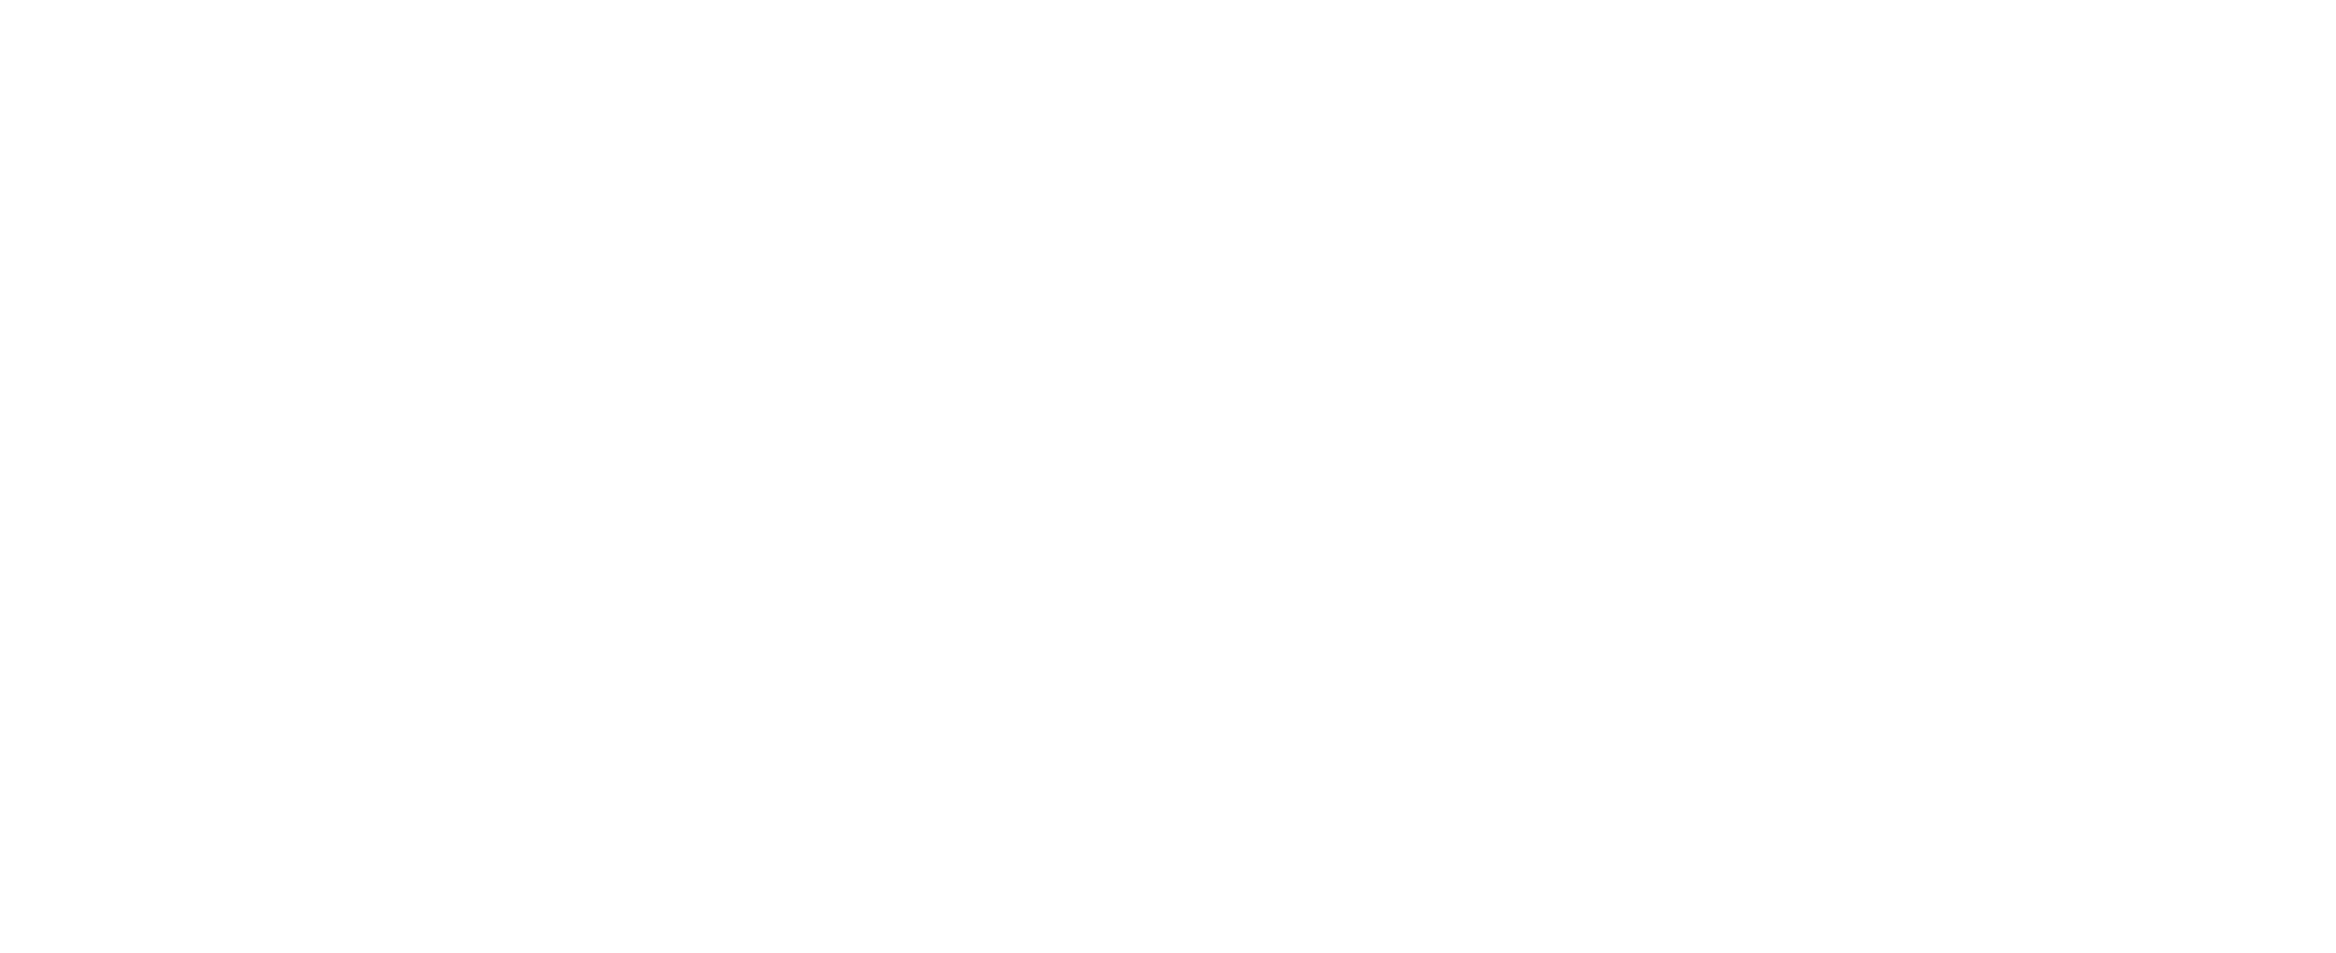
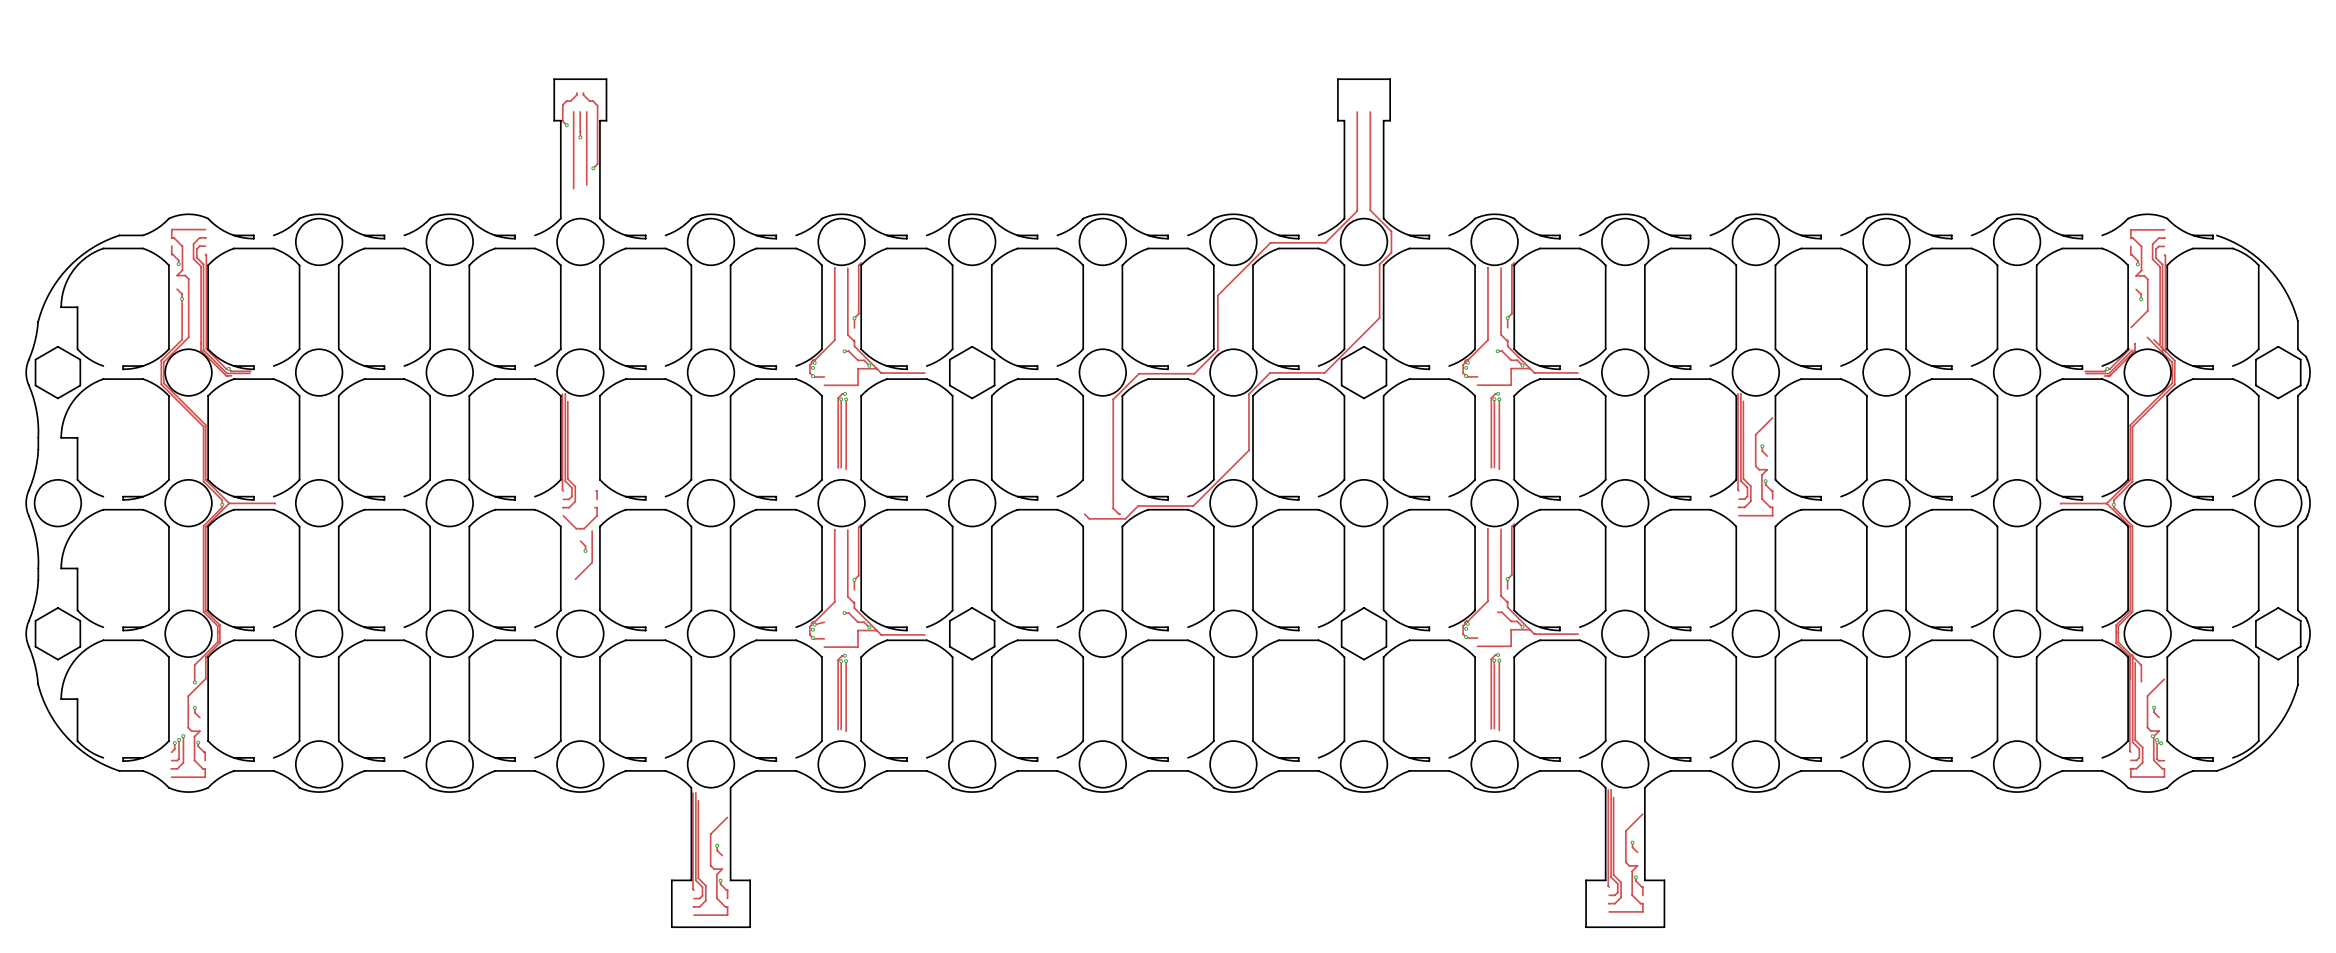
track: none -> (576, 92) (570, 101) (566, 101) (562, 104) (562, 121) (566, 125)
track: none -> (583, 92) (589, 101) (592, 101) (597, 105) (597, 164) (593, 168)
track: none -> (573, 111) (573, 188)
track: none -> (580, 111) (580, 137)
track: none -> (586, 111) (586, 185)
track: none -> (1357, 112) (1357, 211) (1325, 242) (1270, 242) (1217, 295) (1217, 350) (1194, 373) (1139, 373) (1113, 399) (1113, 508) (1120, 514)
track: none -> (1370, 112) (1370, 210) (1391, 231) (1391, 252) (1379, 264) (1379, 317) (1324, 372) (1270, 372) (1248, 394) (1248, 450) (1193, 506) (1138, 506) (1125, 518) (1089, 518) (1084, 514)
via: none -> (566, 125)
via: none -> (580, 137)
via: none -> (593, 168)
round board edge: none -> [295, 217, 344, 266]
round board edge: none -> [425, 217, 474, 266]
round board edge: none -> [556, 217, 605, 266]
round board edge: none -> [687, 217, 735, 266]
round board edge: none -> [817, 217, 866, 266]
round board edge: none -> [948, 217, 997, 266]
round board edge: none -> [1078, 217, 1127, 266]
round board edge: none -> [1209, 217, 1258, 266]
round board edge: none -> [1340, 217, 1389, 266]
round board edge: none -> [1470, 217, 1519, 266]
round board edge: none -> [1601, 217, 1650, 266]
round board edge: none -> [1731, 217, 1780, 266]
round board edge: none -> [1862, 217, 1911, 266]
round board edge: none -> [1993, 217, 2042, 266]
track: none -> (205, 229) (171, 229) (171, 237) (182, 246) (182, 270) (177, 275) (185, 275) (188, 279) (188, 337) (163, 362) (163, 383) (205, 425) (205, 479) (229, 503)
track: none -> (2164, 229) (2130, 229) (2130, 238) (2141, 246) (2141, 270) (2136, 275) (2144, 275) (2147, 279) (2147, 310) (2131, 327)
board edge: none -> (233, 235) (253, 235) (253, 238) (243, 237) (238, 236) (233, 235) (219, 228) (208, 218) (188, 214) (168, 218) (157, 228) (143, 235) (119, 235) (112, 237) (94, 246) (72, 263) (54, 284) (42, 308) (26, 372) (35, 404) (38, 424) (36, 463) (26, 503) (36, 541) (38, 561) (36, 594) (26, 633) (40, 691) (54, 721) (77, 747) (100, 762) (119, 770) (143, 770) (157, 777) (168, 787) (184, 791) (196, 791) (208, 787) (219, 777) (233, 770) (273, 770) (287, 777) (299, 787) (319, 792) (338, 787) (350, 777) (364, 770) (404, 770) (418, 777) (430, 787) (449, 792) (469, 787) (481, 777) (495, 770) (534, 770) (548, 777) (560, 787) (580, 792) (599, 787) (611, 777) (625, 770) (665, 770) (679, 777) (691, 787) (691, 880) (671, 880) (671, 927) (750, 927) (750, 880) (730, 880) (730, 787) (742, 777) (756, 770) (796, 770) (810, 777) (822, 787) (841, 792) (861, 787) (873, 777) (887, 770) (926, 770) (940, 777) (952, 787) (972, 792) (991, 787) (1003, 777) (1017, 770) (1057, 770) (1071, 777) (1083, 787) (1102, 792) (1122, 787) (1134, 777) (1148, 770) (1187, 770) (1201, 777) (1213, 787) (1233, 792) (1253, 787) (1264, 777) (1278, 770) (1318, 770) (1332, 777) (1344, 787) (1364, 792) (1383, 787) (1395, 777) (1409, 770) (1449, 770) (1463, 777) (1475, 787) (1494, 792) (1514, 787) (1526, 777) (1540, 770) (1579, 770) (1593, 777) (1605, 787) (1605, 880) (1586, 880) (1586, 927) (1664, 927) (1664, 880) (1644, 880) (1644, 787) (1656, 777) (1670, 770) (1710, 770) (1724, 777) (1736, 787) (1755, 792) (1775, 787) (1787, 777) (1801, 770) (1841, 770) (1855, 777) (1866, 787) (1886, 792) (1906, 787) (1917, 777) (1931, 770) (1971, 770) (1985, 777) (1997, 787) (2017, 792) (2036, 787) (2048, 777) (2062, 770) (2102, 770) (2116, 777) (2128, 787) (2147, 792) (2167, 787) (2179, 777) (2193, 770) (2216, 770) (2229, 765) (2258, 747) (2281, 722) (2291, 704) (2297, 685) (2297, 657) (2306, 649) (2309, 640) (2307, 621) (2297, 610) (2297, 526) (2306, 519) (2310, 503) (2306, 487) (2297, 479) (2297, 395) (2306, 388) (2310, 372) (2306, 356) (2297, 349) (2297, 321) (2295, 314) (2281, 284) (2268, 267) (2253, 254) (2235, 243) (2216, 235)
board edge: none -> (273, 235) (287, 228) (299, 218) (319, 214) (338, 218) (350, 228) (364, 235) (369, 236) (374, 237) (384, 238) (384, 235) (364, 235)
board edge: none -> (404, 235) (418, 228) (430, 218) (449, 214) (469, 218) (481, 228) (494, 235) (499, 236) (504, 237) (515, 238) (515, 235) (495, 235)
board edge: none -> (534, 235) (548, 228) (560, 218) (560, 120) (554, 120) (554, 79) (606, 79) (606, 120) (599, 120) (599, 218) (620, 233) (625, 235) (630, 236) (645, 238) (645, 235) (625, 235)
board edge: none -> (665, 235) (679, 228) (691, 218) (710, 214) (730, 218) (742, 228) (756, 235) (761, 236) (766, 237) (776, 238) (776, 235) (756, 235)
board edge: none -> (796, 235) (810, 228) (822, 218) (841, 214) (861, 218) (872, 228) (886, 235) (891, 236) (896, 237) (906, 238) (906, 235) (887, 235)
board edge: none -> (926, 235) (940, 228) (952, 218) (972, 214) (991, 218) (1003, 228) (1017, 235) (1022, 236) (1027, 237) (1037, 238) (1037, 235) (1017, 235)
board edge: none -> (1057, 235) (1071, 228) (1083, 218) (1102, 214) (1122, 218) (1134, 228) (1147, 235) (1152, 236) (1157, 237) (1168, 238) (1168, 235) (1148, 235)
board edge: none -> (1187, 235) (1201, 228) (1213, 218) (1233, 214) (1253, 218) (1264, 228) (1278, 235) (1283, 236) (1288, 237) (1298, 238) (1298, 235) (1278, 235)
board edge: none -> (1318, 235) (1332, 228) (1344, 218) (1344, 120) (1337, 120) (1337, 79) (1390, 79) (1390, 120) (1383, 120) (1383, 218) (1404, 233) (1409, 235) (1414, 236) (1429, 238) (1429, 235) (1409, 235)
board edge: none -> (1449, 235) (1463, 228) (1475, 218) (1494, 214) (1514, 218) (1525, 228) (1539, 235) (1544, 236) (1549, 237) (1559, 238) (1559, 235) (1540, 235)
board edge: none -> (1579, 235) (1593, 228) (1605, 218) (1625, 214) (1644, 218) (1656, 228) (1670, 235) (1675, 236) (1680, 237) (1690, 238) (1690, 235) (1670, 235)
board edge: none -> (1710, 235) (1724, 228) (1736, 218) (1755, 214) (1775, 218) (1787, 228) (1800, 235) (1805, 236) (1810, 237) (1821, 238) (1821, 235) (1801, 235)
board edge: none -> (1841, 235) (1855, 228) (1866, 218) (1886, 214) (1906, 218) (1917, 228) (1931, 235) (1936, 236) (1941, 237) (1951, 238) (1951, 235) (1931, 235)
board edge: none -> (1971, 235) (1985, 228) (1997, 218) (2017, 214) (2036, 218) (2048, 228) (2062, 235) (2067, 236) (2072, 237) (2082, 238) (2082, 235) (2062, 235)
board edge: none -> (2102, 235) (2116, 228) (2128, 218) (2147, 214) (2167, 218) (2179, 228) (2192, 235) (2197, 236) (2202, 237) (2213, 238) (2213, 235) (2193, 235)
track: none -> (206, 237) (199, 237) (193, 244) (193, 259) (201, 266) (201, 350) (226, 375) (231, 375)
track: none -> (2165, 238) (2158, 238) (2152, 244) (2152, 259) (2160, 266) (2160, 344)
track: none -> (171, 246) (171, 254) (178, 260) (178, 264)
track: none -> (205, 246) (199, 246) (196, 248) (196, 257) (203, 264) (203, 350) (226, 373) (250, 373)
track: none -> (2130, 246) (2130, 254) (2137, 260) (2137, 264)
track: none -> (2164, 246) (2158, 246) (2155, 249) (2155, 257) (2162, 264) (2162, 352)
track: none -> (205, 254) (206, 349) (226, 368) (231, 371) (250, 371)
track: none -> (2164, 254) (2165, 351)
track: none -> (861, 262) (858, 265) (858, 313) (854, 318) (854, 327)
track: none -> (1514, 262) (1511, 265) (1511, 313) (1507, 318) (1507, 327)
via: none -> (178, 264)
via: none -> (2137, 264)
track: none -> (1487, 267) (1487, 340) (1463, 364) (1463, 373) (1467, 376) (1477, 376)
track: none -> (834, 268) (834, 340) (809, 365) (809, 373) (813, 377) (824, 377)
track: none -> (847, 268) (847, 334) (854, 341)
track: none -> (1501, 268) (1501, 334) (1507, 341)
track: none -> (177, 289) (182, 294) (182, 339) (161, 360) (161, 384) (203, 426) (203, 481) (222, 500) (222, 507) (203, 526) (203, 611) (217, 625) (217, 642) (194, 665) (194, 681)
track: none -> (2136, 289) (2141, 294) (2141, 299)
via: none -> (182, 298)
via: none -> (2141, 299)
via: none -> (854, 318)
via: none -> (1507, 318)
track: none -> (2147, 337) (2172, 362) (2172, 383) (2130, 425) (2130, 480) (2106, 503)
track: none -> (2153, 339) (2174, 360) (2174, 384) (2132, 426) (2132, 481) (2113, 500) (2113, 507) (2132, 526) (2132, 611) (2118, 626) (2118, 642) (2141, 665) (2141, 681)
track: none -> (854, 340) (854, 346) (881, 373) (924, 373)
track: none -> (1507, 340) (1507, 346) (1534, 372) (1578, 372)
track: none -> (2135, 343) (2134, 350)
board edge: none -> (57, 346) (35, 359) (35, 385) (57, 398) (80, 385) (80, 359) (57, 346)
board edge: none -> (972, 346) (994, 359) (994, 385) (972, 398) (949, 385) (949, 359) (972, 346)
board edge: none -> (1364, 346) (1386, 359) (1386, 385) (1364, 398) (1341, 385) (1341, 359) (1364, 346)
board edge: none -> (2278, 346) (2300, 359) (2300, 385) (2278, 398) (2255, 385) (2255, 359) (2278, 346)
round board edge: none -> [164, 348, 213, 397]
round board edge: none -> [295, 348, 344, 397]
round board edge: none -> [425, 348, 474, 397]
round board edge: none -> [556, 348, 605, 397]
round board edge: none -> [687, 348, 735, 397]
round board edge: none -> [1078, 348, 1127, 397]
round board edge: none -> [1209, 348, 1258, 397]
round board edge: none -> [1601, 348, 1650, 397]
round board edge: none -> [1731, 348, 1780, 397]
round board edge: none -> [1862, 348, 1911, 397]
round board edge: none -> [1993, 348, 2042, 397]
round board edge: none -> [2123, 348, 2172, 397]
track: none -> (2129, 349) (2109, 369) (2104, 371) (2085, 371)
track: none -> (2132, 350) (2109, 373) (2085, 373)
track: none -> (844, 351) (848, 351) (858, 360) (864, 360) (869, 365)
via: none -> (844, 351)
track: none -> (1497, 351) (1502, 351) (1511, 360) (1517, 360) (1522, 365)
via: none -> (1497, 351)
track: none -> (2134, 351) (2109, 375) (2104, 375)
via: none -> (814, 362)
via: none -> (1467, 362)
via: none -> (869, 365)
via: none -> (1522, 365)
board edge: none -> (103, 366) (89, 359) (77, 349) (77, 307) (61, 307) (64, 288) (72, 271) (86, 257) (103, 248) (143, 248) (157, 255) (168, 265) (168, 349) (148, 364) (143, 365) (138, 367) (133, 368) (123, 369) (123, 366) (143, 366)
board edge: none -> (233, 366) (253, 366) (253, 369) (238, 367) (233, 365) (228, 364) (208, 349) (208, 265) (219, 255) (233, 248) (273, 248) (287, 255) (299, 265) (299, 349) (287, 359) (273, 366)
board edge: none -> (364, 366) (384, 366) (384, 369) (369, 367) (364, 365) (359, 364) (338, 349) (338, 265) (350, 255) (364, 248) (404, 248) (418, 255) (430, 265) (430, 349) (418, 359) (404, 366)
board edge: none -> (495, 366) (515, 366) (515, 369) (504, 368) (499, 367) (494, 365) (490, 364) (469, 349) (469, 265) (481, 255) (495, 248) (534, 248) (548, 255) (560, 265) (560, 349) (548, 359) (534, 366)
board edge: none -> (625, 366) (645, 366) (645, 369) (635, 368) (630, 367) (625, 365) (620, 364) (599, 349) (599, 265) (611, 255) (625, 248) (665, 248) (679, 255) (691, 265) (691, 349) (679, 359) (665, 366)
board edge: none -> (756, 366) (776, 366) (776, 369) (761, 367) (756, 365) (751, 364) (730, 349) (730, 265) (742, 255) (756, 248) (796, 248) (810, 255) (822, 265) (822, 349) (810, 359) (796, 366)
board edge: none -> (887, 366) (906, 366) (906, 369) (891, 367) (886, 365) (881, 364) (861, 349) (861, 265) (873, 255) (887, 248) (926, 248) (940, 255) (952, 265) (952, 349) (940, 359) (926, 366)
board edge: none -> (1017, 366) (1037, 366) (1037, 369) (1022, 367) (1017, 365) (1012, 364) (991, 349) (991, 265) (1003, 255) (1017, 248) (1057, 248) (1071, 255) (1083, 265) (1083, 349) (1071, 359) (1057, 366)
board edge: none -> (1148, 366) (1168, 366) (1168, 369) (1152, 367) (1147, 365) (1143, 364) (1122, 349) (1122, 265) (1134, 255) (1148, 248) (1187, 248) (1201, 255) (1213, 265) (1213, 349) (1201, 359) (1187, 366)
board edge: none -> (1278, 366) (1298, 366) (1298, 369) (1283, 367) (1278, 365) (1273, 364) (1253, 349) (1253, 265) (1264, 255) (1278, 248) (1318, 248) (1332, 255) (1344, 265) (1344, 349) (1332, 359) (1318, 366)
board edge: none -> (1409, 366) (1429, 366) (1429, 369) (1419, 368) (1414, 367) (1409, 365) (1404, 364) (1383, 349) (1383, 265) (1395, 255) (1409, 248) (1449, 248) (1463, 255) (1475, 265) (1475, 349) (1463, 359) (1449, 366)
board edge: none -> (1540, 366) (1559, 366) (1559, 369) (1544, 367) (1539, 365) (1534, 364) (1514, 349) (1514, 265) (1526, 255) (1540, 248) (1579, 248) (1593, 255) (1605, 265) (1605, 349) (1593, 359) (1579, 366)
board edge: none -> (1670, 366) (1690, 366) (1690, 369) (1680, 368) (1675, 367) (1670, 365) (1665, 364) (1644, 349) (1644, 265) (1656, 255) (1670, 248) (1710, 248) (1724, 255) (1736, 265) (1736, 349) (1724, 359) (1710, 366)
board edge: none -> (1801, 366) (1821, 366) (1821, 369) (1805, 367) (1800, 365) (1796, 364) (1775, 349) (1775, 265) (1787, 255) (1801, 248) (1841, 248) (1855, 255) (1866, 265) (1866, 349) (1855, 359) (1841, 366)
board edge: none -> (1931, 366) (1951, 366) (1951, 369) (1941, 368) (1936, 367) (1931, 365) (1926, 364) (1906, 349) (1906, 265) (1917, 255) (1931, 248) (1971, 248) (1985, 255) (1997, 265) (1997, 349) (1985, 359) (1971, 366)
board edge: none -> (2062, 366) (2082, 366) (2082, 369) (2067, 367) (2062, 365) (2057, 364) (2036, 349) (2036, 265) (2048, 255) (2062, 248) (2102, 248) (2116, 255) (2128, 265) (2128, 349) (2116, 359) (2102, 366)
board edge: none -> (2193, 366) (2213, 366) (2213, 369) (2202, 368) (2197, 367) (2192, 365) (2188, 364) (2167, 349) (2167, 265) (2179, 255) (2193, 248) (2232, 248) (2246, 255) (2258, 265) (2258, 349) (2246, 359) (2232, 366)
via: none -> (813, 367)
via: none -> (1466, 367)
via: none -> (228, 368)
track: none -> (876, 368) (858, 368) (858, 385) (824, 385)
track: none -> (1530, 368) (1511, 368) (1511, 385) (1477, 385)
via: none -> (2107, 369)
via: none -> (813, 376)
via: none -> (1466, 376)
track: none -> (565, 393) (565, 481) (571, 487) (571, 496) (569, 499) (563, 499)
track: none -> (845, 393) (838, 398) (838, 467)
via: none -> (845, 393)
track: none -> (1498, 393) (1491, 398) (1491, 467)
via: none -> (1498, 393)
track: none -> (1738, 393) (1738, 490)
track: none -> (1740, 393) (1740, 480) (1747, 487) (1747, 496) (1744, 499) (1738, 499)
track: none -> (562, 394) (563, 491)
track: none -> (841, 399) (841, 467)
via: none -> (841, 399)
track: none -> (846, 399) (846, 469)
via: none -> (846, 399)
track: none -> (1494, 399) (1494, 467)
via: none -> (1494, 399)
track: none -> (1499, 399) (1499, 469)
via: none -> (1499, 399)
track: none -> (567, 401) (567, 479) (575, 486) (575, 501) (569, 507) (562, 507)
track: none -> (1743, 401) (1743, 478) (1750, 486) (1750, 501) (1744, 507) (1738, 507)
track: none -> (1772, 418) (1755, 434) (1755, 466) (1759, 469) (1767, 469) (1761, 475) (1761, 498) (1772, 507) (1772, 515) (1738, 515)
track: none -> (1762, 446) (1762, 451) (1767, 456)
via: none -> (1762, 446)
round board edge: none -> [33, 479, 82, 528]
round board edge: none -> [164, 479, 213, 528]
round board edge: none -> [295, 479, 344, 528]
round board edge: none -> [425, 479, 474, 528]
round board edge: none -> [687, 479, 735, 528]
round board edge: none -> [817, 479, 866, 528]
round board edge: none -> [948, 479, 997, 528]
round board edge: none -> [1209, 479, 1258, 528]
round board edge: none -> [1340, 479, 1389, 528]
round board edge: none -> [1470, 479, 1519, 528]
round board edge: none -> [1601, 479, 1650, 528]
round board edge: none -> [1862, 479, 1911, 528]
round board edge: none -> [1993, 479, 2042, 528]
round board edge: none -> [2123, 479, 2172, 528]
round board edge: none -> [2254, 479, 2303, 528]
track: none -> (1765, 481) (1765, 484) (1772, 490) (1772, 499)
via: none -> (1765, 481)
track: none -> (596, 491) (597, 499)
board edge: none -> (103, 496) (89, 489) (77, 479) (77, 437) (61, 437) (64, 418) (72, 401) (86, 388) (103, 379) (143, 379) (157, 385) (168, 395) (168, 479) (148, 494) (143, 496) (138, 498) (133, 499) (123, 499) (123, 496) (143, 496)
board edge: none -> (233, 496) (253, 496) (253, 499) (243, 499) (238, 498) (233, 496) (228, 494) (208, 479) (208, 395) (219, 385) (233, 379) (273, 379) (287, 385) (299, 395) (299, 479) (287, 489) (273, 496)
board edge: none -> (364, 496) (384, 496) (384, 499) (374, 499) (369, 498) (364, 496) (359, 494) (338, 479) (338, 395) (350, 385) (364, 379) (404, 379) (418, 385) (430, 395) (430, 479) (418, 489) (404, 496)
board edge: none -> (495, 496) (515, 496) (515, 499) (499, 498) (494, 496) (490, 494) (469, 479) (469, 395) (481, 385) (495, 379) (534, 379) (548, 385) (560, 395) (560, 479) (548, 489) (534, 496)
board edge: none -> (625, 496) (645, 496) (645, 499) (630, 498) (625, 496) (620, 494) (599, 479) (599, 395) (611, 385) (625, 379) (665, 379) (679, 385) (691, 395) (691, 479) (679, 489) (665, 496)
board edge: none -> (756, 496) (776, 496) (776, 499) (761, 498) (756, 496) (751, 494) (730, 479) (730, 395) (742, 385) (756, 379) (796, 379) (810, 385) (822, 395) (822, 479) (810, 489) (796, 496)
board edge: none -> (887, 496) (906, 496) (906, 499) (891, 498) (886, 496) (881, 494) (861, 479) (861, 395) (873, 385) (887, 379) (926, 379) (940, 385) (952, 395) (952, 479) (940, 489) (926, 496)
board edge: none -> (1017, 496) (1037, 496) (1037, 499) (1022, 498) (1017, 496) (1012, 494) (991, 479) (991, 395) (1003, 385) (1017, 379) (1057, 379) (1071, 385) (1083, 395) (1083, 479) (1071, 489) (1057, 496)
board edge: none -> (1148, 496) (1168, 496) (1168, 499) (1152, 498) (1147, 496) (1143, 494) (1122, 479) (1122, 395) (1134, 385) (1148, 379) (1187, 379) (1201, 385) (1213, 395) (1213, 479) (1201, 489) (1187, 496)
board edge: none -> (1278, 496) (1298, 496) (1298, 499) (1288, 499) (1283, 498) (1278, 496) (1273, 494) (1253, 479) (1253, 395) (1264, 385) (1278, 379) (1318, 379) (1332, 385) (1344, 395) (1344, 479) (1332, 489) (1318, 496)
board edge: none -> (1409, 496) (1429, 496) (1429, 499) (1414, 498) (1409, 496) (1404, 494) (1383, 479) (1383, 395) (1395, 385) (1409, 379) (1449, 379) (1463, 385) (1475, 395) (1475, 479) (1463, 489) (1449, 496)
board edge: none -> (1540, 496) (1559, 496) (1559, 499) (1544, 498) (1539, 496) (1534, 494) (1514, 479) (1514, 395) (1526, 385) (1540, 379) (1579, 379) (1593, 385) (1605, 395) (1605, 479) (1593, 489) (1579, 496)
board edge: none -> (1670, 496) (1690, 496) (1690, 499) (1680, 499) (1675, 498) (1670, 496) (1665, 494) (1644, 479) (1644, 395) (1656, 385) (1670, 379) (1710, 379) (1724, 385) (1736, 395) (1736, 479) (1724, 489) (1710, 496)
board edge: none -> (1801, 496) (1821, 496) (1821, 499) (1805, 498) (1800, 496) (1796, 494) (1775, 479) (1775, 395) (1787, 385) (1801, 379) (1841, 379) (1855, 385) (1866, 395) (1866, 479) (1855, 489) (1841, 496)
board edge: none -> (1931, 496) (1951, 496) (1951, 499) (1936, 498) (1931, 496) (1926, 494) (1906, 479) (1906, 395) (1917, 385) (1931, 379) (1971, 379) (1985, 385) (1997, 395) (1997, 479) (1985, 489) (1971, 496)
board edge: none -> (2062, 496) (2082, 496) (2082, 499) (2067, 498) (2062, 496) (2057, 494) (2036, 479) (2036, 395) (2048, 385) (2062, 379) (2102, 379) (2116, 385) (2128, 395) (2128, 479) (2116, 489) (2102, 496)
board edge: none -> (2193, 496) (2213, 496) (2213, 499) (2197, 498) (2192, 496) (2188, 494) (2167, 479) (2167, 395) (2179, 385) (2193, 379) (2232, 379) (2246, 385) (2258, 395) (2258, 479) (2246, 489) (2232, 496)
track: none -> (229, 503) (205, 526) (205, 610) (219, 625) (219, 642) (205, 657) (205, 678) (188, 696) (188, 727) (191, 731) (199, 731) (194, 736) (194, 760) (205, 768) (205, 777) (171, 777)
track: none -> (229, 503) (275, 503)
track: none -> (2106, 503) (2130, 527) (2130, 611) (2116, 625) (2116, 643) (2130, 657) (2130, 678)
track: none -> (2106, 503) (2060, 503)
via: none -> (222, 504)
via: none -> (2113, 504)
track: none -> (594, 507) (597, 507) (597, 515)
track: none -> (563, 515) (576, 528) (584, 528) (597, 515)
track: none -> (1514, 523) (1511, 526) (1511, 574) (1507, 579) (1507, 588)
track: none -> (861, 524) (858, 527) (858, 575) (854, 579) (854, 589)
track: none -> (834, 529) (834, 602) (809, 626) (809, 634) (813, 638) (824, 638)
track: none -> (1487, 529) (1487, 601) (1463, 626) (1463, 634) (1466, 638) (1477, 638)
track: none -> (1500, 529) (1500, 595) (1507, 602)
track: none -> (847, 530) (847, 596) (854, 603)
track: none -> (592, 531) (592, 562) (575, 579)
track: none -> (580, 541) (585, 546) (585, 550)
via: none -> (585, 550)
via: none -> (854, 579)
via: none -> (1507, 579)
track: none -> (1507, 601) (1507, 607) (1534, 634) (1578, 634)
track: none -> (854, 602) (854, 608) (881, 634) (924, 634)
board edge: none -> (57, 607) (35, 620) (35, 646) (57, 659) (80, 646) (80, 620) (57, 607)
board edge: none -> (972, 607) (994, 620) (994, 646) (972, 659) (949, 646) (949, 620) (972, 607)
board edge: none -> (1364, 607) (1386, 620) (1386, 646) (1364, 659) (1341, 646) (1341, 620) (1364, 607)
board edge: none -> (2278, 607) (2300, 620) (2300, 646) (2278, 659) (2255, 646) (2255, 620) (2278, 607)
round board edge: none -> [164, 609, 213, 658]
round board edge: none -> [295, 609, 344, 658]
round board edge: none -> [425, 609, 474, 658]
round board edge: none -> [556, 609, 605, 658]
round board edge: none -> [687, 609, 735, 658]
round board edge: none -> [1078, 609, 1127, 658]
round board edge: none -> [1209, 609, 1258, 658]
round board edge: none -> [1601, 609, 1650, 658]
round board edge: none -> [1731, 609, 1780, 658]
round board edge: none -> [1862, 609, 1911, 658]
round board edge: none -> [1993, 609, 2042, 658]
round board edge: none -> [2123, 609, 2172, 658]
track: none -> (1497, 612) (1502, 612) (1511, 621) (1517, 621) (1522, 626)
track: none -> (844, 613) (848, 613) (857, 622) (864, 622) (869, 627)
via: none -> (844, 613)
track: none -> (824, 622) (814, 624)
via: none -> (1467, 623)
via: none -> (814, 624)
via: none -> (1522, 626)
board edge: none -> (103, 627) (89, 620) (77, 610) (77, 568) (61, 568) (64, 549) (72, 532) (86, 518) (103, 509) (143, 509) (157, 516) (168, 526) (168, 610) (148, 625) (143, 627) (138, 628) (133, 629) (123, 630) (123, 627) (143, 627)
board edge: none -> (233, 627) (253, 627) (253, 630) (238, 628) (233, 627) (228, 625) (208, 610) (208, 526) (219, 516) (233, 509) (273, 509) (287, 516) (299, 526) (299, 610) (287, 620) (273, 627)
board edge: none -> (364, 627) (384, 627) (384, 630) (369, 628) (364, 627) (359, 625) (338, 610) (338, 526) (350, 516) (364, 509) (404, 509) (418, 516) (430, 526) (430, 610) (418, 620) (404, 627)
board edge: none -> (495, 627) (515, 627) (515, 630) (504, 629) (499, 628) (494, 627) (490, 625) (469, 610) (469, 526) (481, 516) (495, 509) (534, 509) (548, 516) (560, 526) (560, 610) (548, 620) (534, 627)
board edge: none -> (625, 627) (645, 627) (645, 630) (630, 628) (625, 627) (620, 625) (599, 610) (599, 526) (611, 516) (625, 509) (665, 509) (679, 516) (691, 526) (691, 610) (679, 620) (665, 627)
board edge: none -> (756, 627) (776, 627) (776, 630) (766, 629) (761, 628) (756, 627) (751, 625) (730, 610) (730, 526) (742, 516) (756, 509) (796, 509) (810, 516) (822, 526) (822, 610) (810, 620) (796, 627)
via: none -> (869, 627)
board edge: none -> (887, 627) (906, 627) (906, 630) (896, 629) (891, 628) (886, 627) (881, 625) (861, 610) (861, 526) (873, 516) (887, 509) (926, 509) (940, 516) (952, 526) (952, 610) (940, 620) (926, 627)
board edge: none -> (1017, 627) (1037, 627) (1037, 630) (1022, 628) (1017, 627) (1012, 625) (991, 610) (991, 526) (1003, 516) (1017, 509) (1057, 509) (1071, 516) (1083, 526) (1083, 610) (1071, 620) (1057, 627)
board edge: none -> (1148, 627) (1168, 627) (1168, 630) (1152, 628) (1147, 627) (1143, 625) (1122, 610) (1122, 526) (1134, 516) (1148, 509) (1187, 509) (1201, 516) (1213, 526) (1213, 610) (1201, 620) (1187, 627)
board edge: none -> (1278, 627) (1298, 627) (1298, 630) (1283, 628) (1278, 627) (1273, 625) (1253, 610) (1253, 526) (1264, 516) (1278, 509) (1318, 509) (1332, 516) (1344, 526) (1344, 610) (1332, 620) (1318, 627)
board edge: none -> (1409, 627) (1429, 627) (1429, 630) (1419, 629) (1414, 628) (1409, 627) (1404, 625) (1383, 610) (1383, 526) (1395, 516) (1409, 509) (1449, 509) (1463, 516) (1475, 526) (1475, 610) (1463, 620) (1449, 627)
board edge: none -> (1540, 627) (1559, 627) (1559, 630) (1544, 628) (1539, 627) (1534, 625) (1514, 610) (1514, 526) (1526, 516) (1540, 509) (1579, 509) (1593, 516) (1605, 526) (1605, 610) (1593, 620) (1579, 627)
board edge: none -> (1670, 627) (1690, 627) (1690, 630) (1675, 628) (1670, 627) (1665, 625) (1644, 610) (1644, 526) (1656, 516) (1670, 509) (1710, 509) (1724, 516) (1736, 526) (1736, 610) (1724, 620) (1710, 627)
board edge: none -> (1801, 627) (1821, 627) (1821, 630) (1810, 629) (1805, 628) (1800, 627) (1796, 625) (1775, 610) (1775, 526) (1787, 516) (1801, 509) (1841, 509) (1855, 516) (1866, 526) (1866, 610) (1855, 620) (1841, 627)
board edge: none -> (1931, 627) (1951, 627) (1951, 630) (1936, 628) (1931, 627) (1926, 625) (1906, 610) (1906, 526) (1917, 516) (1931, 509) (1971, 509) (1985, 516) (1997, 526) (1997, 610) (1985, 620) (1971, 627)
board edge: none -> (2062, 627) (2082, 627) (2082, 630) (2072, 629) (2067, 628) (2062, 627) (2057, 625) (2036, 610) (2036, 526) (2048, 516) (2062, 509) (2102, 509) (2116, 516) (2128, 526) (2128, 610) (2116, 620) (2102, 627)
board edge: none -> (2193, 627) (2213, 627) (2213, 630) (2197, 628) (2192, 627) (2188, 625) (2167, 610) (2167, 526) (2179, 516) (2193, 509) (2232, 509) (2246, 516) (2258, 526) (2258, 610) (2246, 620) (2232, 627)
via: none -> (1466, 628)
via: none -> (812, 629)
track: none -> (1529, 629) (1511, 629) (1511, 646) (1477, 646)
track: none -> (876, 630) (857, 630) (857, 647) (824, 647)
via: none -> (812, 637)
via: none -> (1466, 637)
track: none -> (1498, 654) (1491, 659) (1491, 728)
via: none -> (1498, 654)
track: none -> (2132, 654) (2132, 742) (2139, 748) (2139, 757) (2136, 760) (2130, 760)
track: none -> (844, 655) (838, 659) (838, 729)
via: none -> (844, 655)
track: none -> (2129, 655) (2130, 752)
track: none -> (1494, 660) (1494, 728)
via: none -> (1494, 660)
track: none -> (1499, 660) (1499, 730)
via: none -> (1499, 660)
track: none -> (841, 661) (841, 729)
via: none -> (841, 661)
track: none -> (846, 661) (846, 731)
via: none -> (846, 661)
track: none -> (2135, 662) (2135, 740) (2142, 747) (2142, 762) (2136, 768) (2130, 768)
track: none -> (2164, 679) (2147, 696) (2147, 727) (2150, 731) (2159, 731) (2153, 736) (2153, 760) (2164, 768) (2164, 777) (2130, 777)
via: none -> (194, 682)
track: none -> (194, 707) (194, 712) (199, 717)
via: none -> (194, 707)
track: none -> (2154, 707) (2154, 712) (2159, 717)
via: none -> (2154, 707)
track: none -> (183, 736) (183, 762) (177, 768) (170, 768)
via: none -> (183, 736)
via: none -> (2152, 736)
via: none -> (179, 739)
round board edge: none -> [295, 740, 344, 789]
round board edge: none -> [425, 740, 474, 789]
round board edge: none -> [556, 740, 605, 789]
round board edge: none -> [687, 740, 735, 789]
round board edge: none -> [817, 740, 866, 789]
round board edge: none -> [948, 740, 997, 789]
round board edge: none -> [1078, 740, 1127, 789]
round board edge: none -> [1209, 740, 1258, 789]
round board edge: none -> [1340, 740, 1389, 789]
round board edge: none -> [1470, 740, 1519, 789]
round board edge: none -> [1601, 740, 1650, 789]
round board edge: none -> [1731, 740, 1780, 789]
round board edge: none -> [1862, 740, 1911, 789]
round board edge: none -> [1993, 740, 2042, 789]
via: none -> (2156, 740)
track: none -> (179, 741) (179, 758) (171, 760)
track: none -> (2157, 741) (2157, 759) (2164, 760)
track: none -> (198, 742) (198, 746) (205, 752) (205, 760)
via: none -> (198, 742)
via: none -> (2157, 742)
track: none -> (174, 743) (174, 749) (171, 752)
via: none -> (174, 743)
via: none -> (2161, 743)
board edge: none -> (103, 757) (89, 751) (77, 741) (77, 699) (61, 699) (64, 680) (72, 662) (86, 649) (103, 640) (143, 640) (157, 647) (168, 657) (168, 741) (148, 755) (143, 757) (138, 759) (133, 760) (123, 761) (123, 757) (143, 757)
board edge: none -> (233, 757) (253, 757) (253, 761) (238, 759) (233, 757) (228, 755) (208, 741) (208, 657) (219, 647) (233, 640) (273, 640) (287, 647) (299, 657) (299, 741) (287, 751) (273, 757)
board edge: none -> (364, 757) (384, 757) (384, 761) (374, 760) (369, 759) (364, 757) (359, 755) (338, 741) (338, 657) (350, 647) (364, 640) (404, 640) (418, 647) (430, 657) (430, 741) (418, 751) (404, 757)
board edge: none -> (495, 757) (515, 757) (515, 761) (504, 760) (499, 759) (494, 757) (490, 755) (469, 741) (469, 657) (481, 647) (495, 640) (534, 640) (548, 647) (560, 657) (560, 741) (548, 751) (534, 757)
board edge: none -> (625, 757) (645, 757) (645, 761) (635, 760) (630, 759) (625, 757) (620, 755) (599, 741) (599, 657) (611, 647) (625, 640) (665, 640) (679, 647) (691, 657) (691, 741) (679, 751) (665, 757)
board edge: none -> (756, 757) (776, 757) (776, 761) (766, 760) (761, 759) (756, 757) (751, 755) (730, 741) (730, 657) (742, 647) (756, 640) (796, 640) (810, 647) (822, 657) (822, 741) (810, 751) (796, 757)
board edge: none -> (887, 757) (906, 757) (906, 761) (891, 759) (886, 757) (881, 755) (861, 741) (861, 657) (873, 647) (887, 640) (926, 640) (940, 647) (952, 657) (952, 741) (940, 751) (926, 757)
board edge: none -> (1017, 757) (1037, 757) (1037, 761) (1027, 760) (1022, 759) (1017, 757) (1012, 755) (991, 741) (991, 657) (1003, 647) (1017, 640) (1057, 640) (1071, 647) (1083, 657) (1083, 741) (1071, 751) (1057, 757)
board edge: none -> (1148, 757) (1168, 757) (1168, 761) (1152, 759) (1147, 757) (1143, 755) (1122, 741) (1122, 657) (1134, 647) (1148, 640) (1187, 640) (1201, 647) (1213, 657) (1213, 741) (1201, 751) (1187, 757)
board edge: none -> (1278, 757) (1298, 757) (1298, 761) (1283, 759) (1278, 757) (1273, 755) (1253, 741) (1253, 657) (1264, 647) (1278, 640) (1318, 640) (1332, 647) (1344, 657) (1344, 741) (1332, 751) (1318, 757)
board edge: none -> (1409, 757) (1429, 757) (1429, 761) (1419, 760) (1414, 759) (1409, 757) (1404, 755) (1383, 741) (1383, 657) (1395, 647) (1409, 640) (1449, 640) (1463, 647) (1475, 657) (1475, 741) (1463, 751) (1449, 757)
board edge: none -> (1540, 757) (1559, 757) (1559, 761) (1549, 760) (1544, 759) (1539, 757) (1534, 755) (1514, 741) (1514, 657) (1526, 647) (1540, 640) (1579, 640) (1593, 647) (1605, 657) (1605, 741) (1593, 751) (1579, 757)
board edge: none -> (1670, 757) (1690, 757) (1690, 761) (1675, 759) (1670, 757) (1665, 755) (1644, 741) (1644, 657) (1656, 647) (1670, 640) (1710, 640) (1724, 647) (1736, 657) (1736, 741) (1724, 751) (1710, 757)
board edge: none -> (1801, 757) (1821, 757) (1821, 761) (1805, 759) (1800, 757) (1796, 755) (1775, 741) (1775, 657) (1787, 647) (1801, 640) (1841, 640) (1855, 647) (1866, 657) (1866, 741) (1855, 751) (1841, 757)
board edge: none -> (1931, 757) (1951, 757) (1951, 761) (1941, 760) (1936, 759) (1931, 757) (1926, 755) (1906, 741) (1906, 657) (1917, 647) (1931, 640) (1971, 640) (1985, 647) (1997, 657) (1997, 741) (1985, 751) (1971, 757)
board edge: none -> (2062, 757) (2082, 757) (2082, 761) (2072, 760) (2067, 759) (2062, 757) (2057, 755) (2036, 741) (2036, 657) (2048, 647) (2062, 640) (2102, 640) (2116, 647) (2128, 657) (2128, 741) (2116, 751) (2102, 757)
board edge: none -> (2193, 757) (2213, 757) (2213, 761) (2197, 759) (2192, 757) (2188, 755) (2167, 741) (2167, 657) (2179, 647) (2193, 640) (2232, 640) (2246, 647) (2258, 657) (2258, 741) (2246, 751) (2232, 757)
track: none -> (2133, 769) (2130, 769) (2130, 777)
track: none -> (1611, 789) (1611, 877) (1617, 883) (1617, 892) (1614, 895) (1609, 895)
track: none -> (1608, 790) (1609, 887)
track: none -> (695, 792) (695, 880) (702, 887) (702, 895) (699, 898) (693, 898)
track: none -> (692, 793) (693, 890)
track: none -> (1613, 797) (1613, 875) (1621, 882) (1621, 897) (1614, 903) (1608, 903)
track: none -> (698, 800) (698, 878) (705, 885) (705, 900) (699, 906) (693, 906)
track: none -> (1642, 814) (1625, 830) (1625, 862) (1629, 865) (1637, 865) (1632, 871) (1632, 895) (1642, 903) (1642, 911) (1609, 911)
track: none -> (727, 817) (710, 834) (710, 865) (714, 869) (722, 869) (716, 874) (716, 898) (727, 906) (727, 915) (693, 915)
track: none -> (1632, 842) (1632, 847) (1637, 852)
via: none -> (1632, 842)
track: none -> (717, 845) (717, 850) (722, 855)
via: none -> (717, 845)
track: none -> (1635, 877) (1635, 881) (1642, 887) (1642, 895)
via: none -> (1635, 877)
track: none -> (720, 880) (720, 884) (727, 890) (727, 898)
via: none -> (720, 880)

